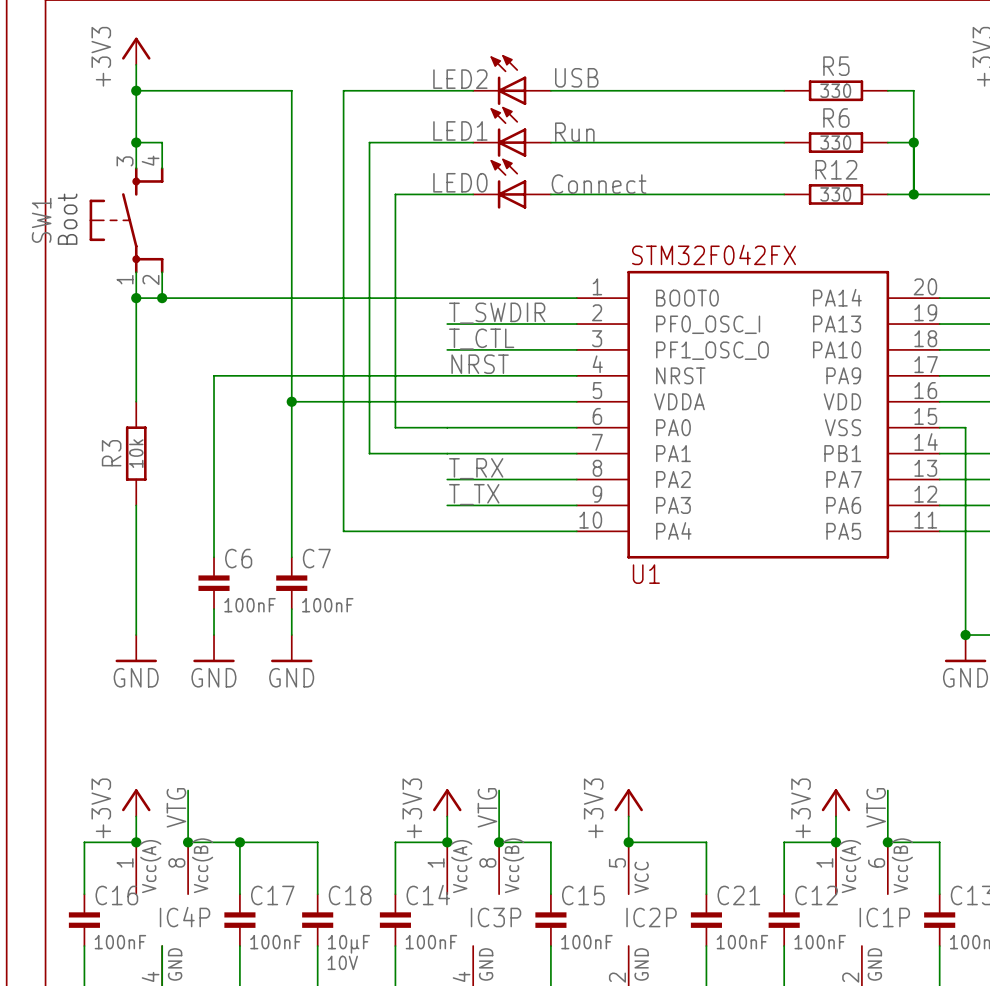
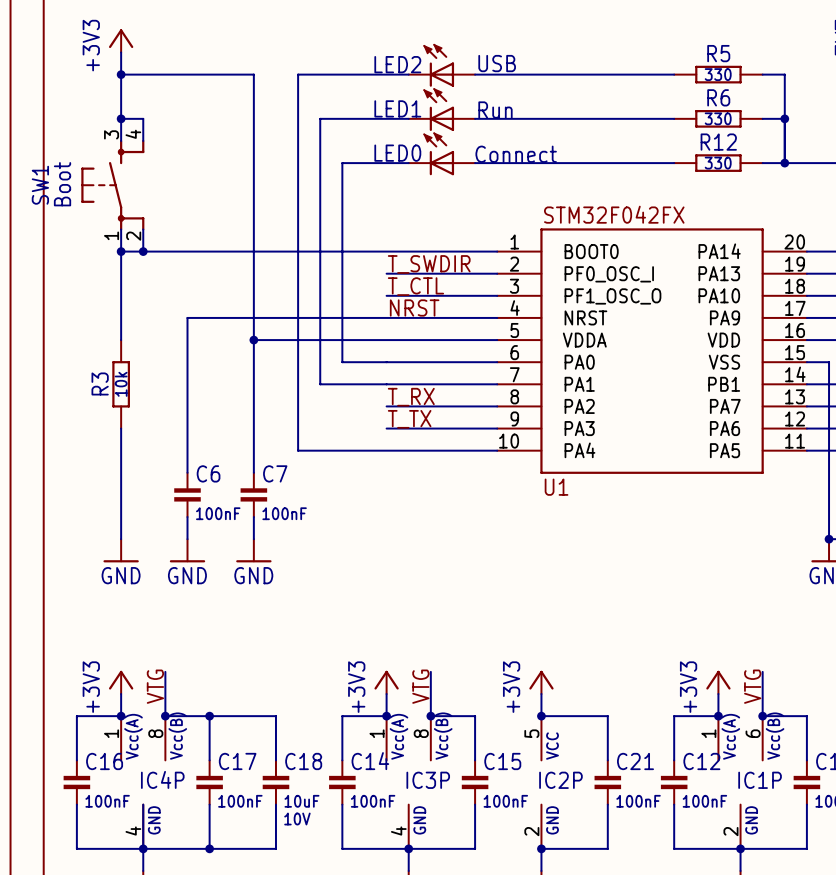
C18 value: 10µF (348, 944) -> 10uF (301, 801)

